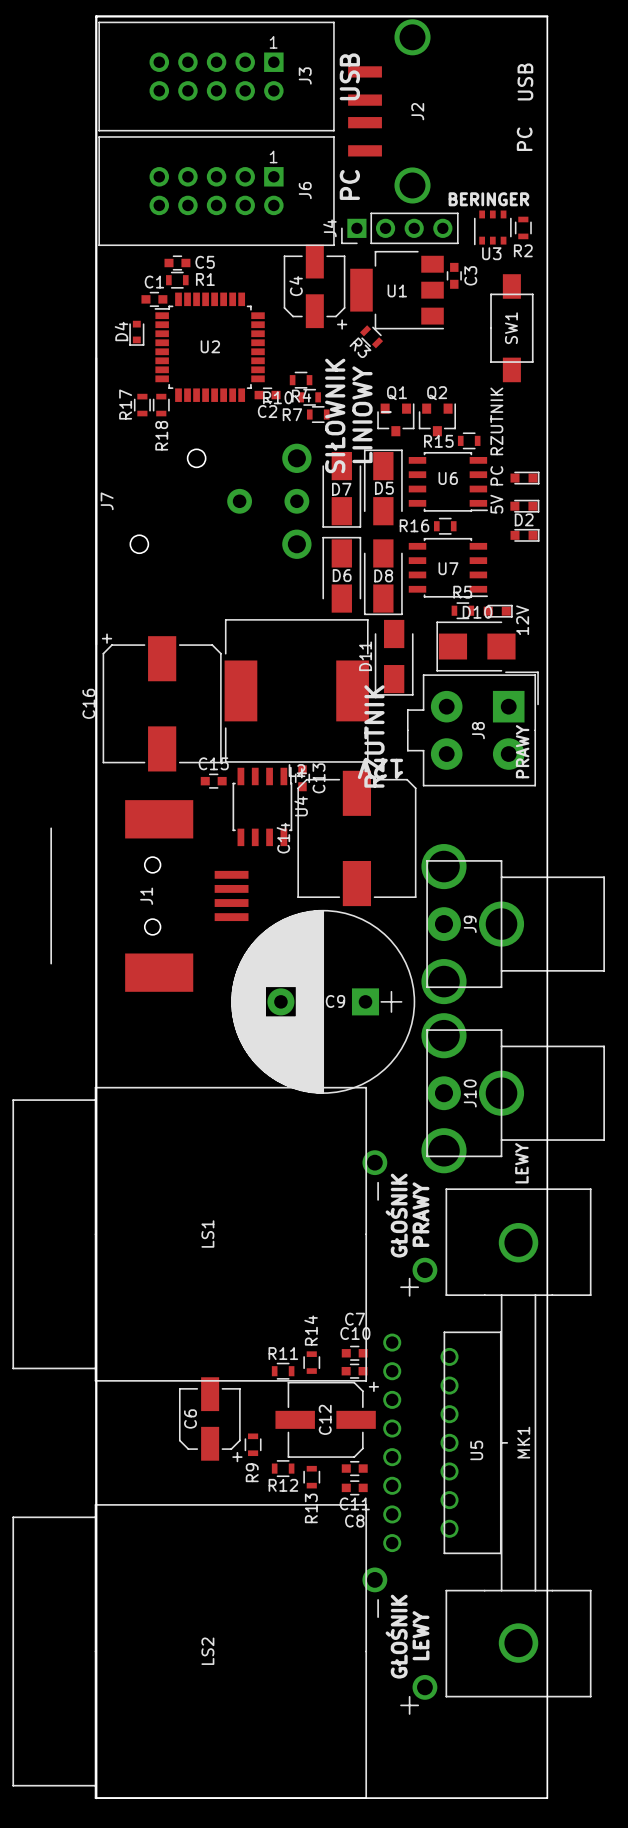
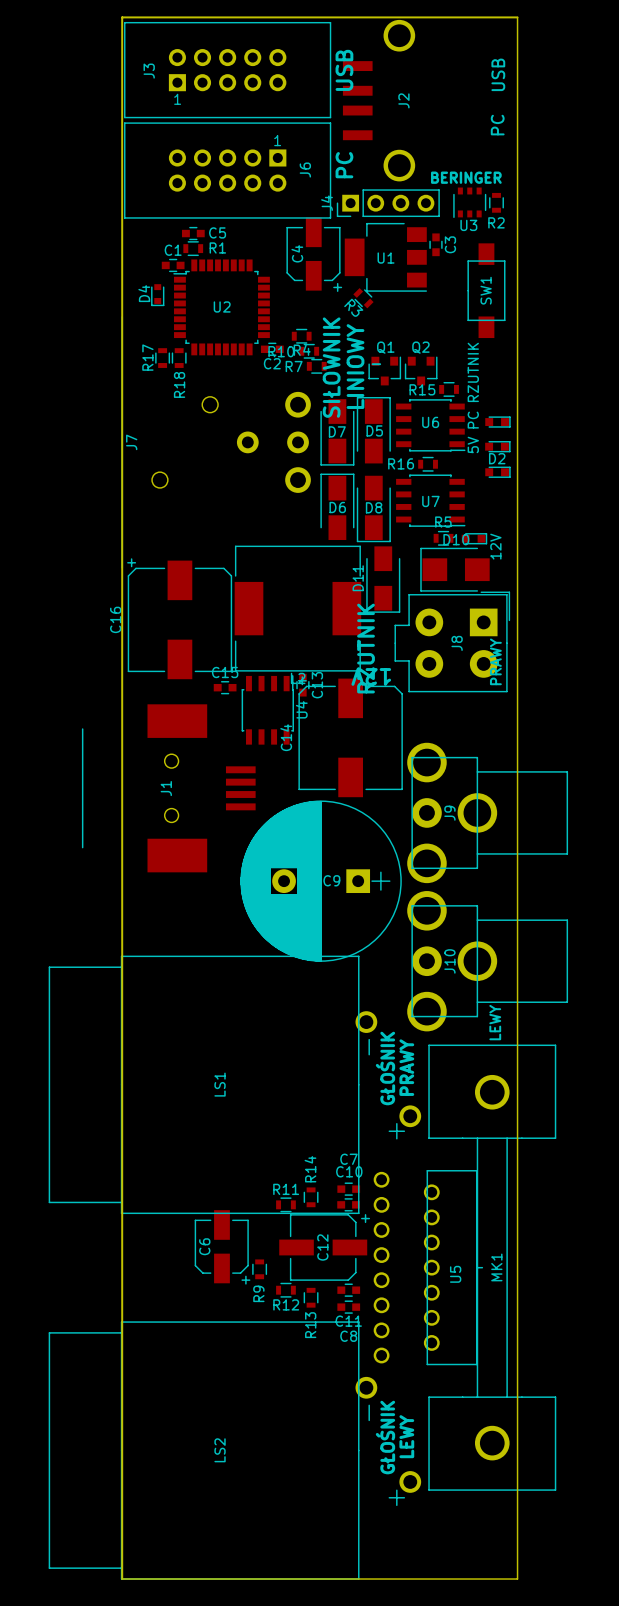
J3 rotation: 0° (216, 76) -> 180° (227, 70)

